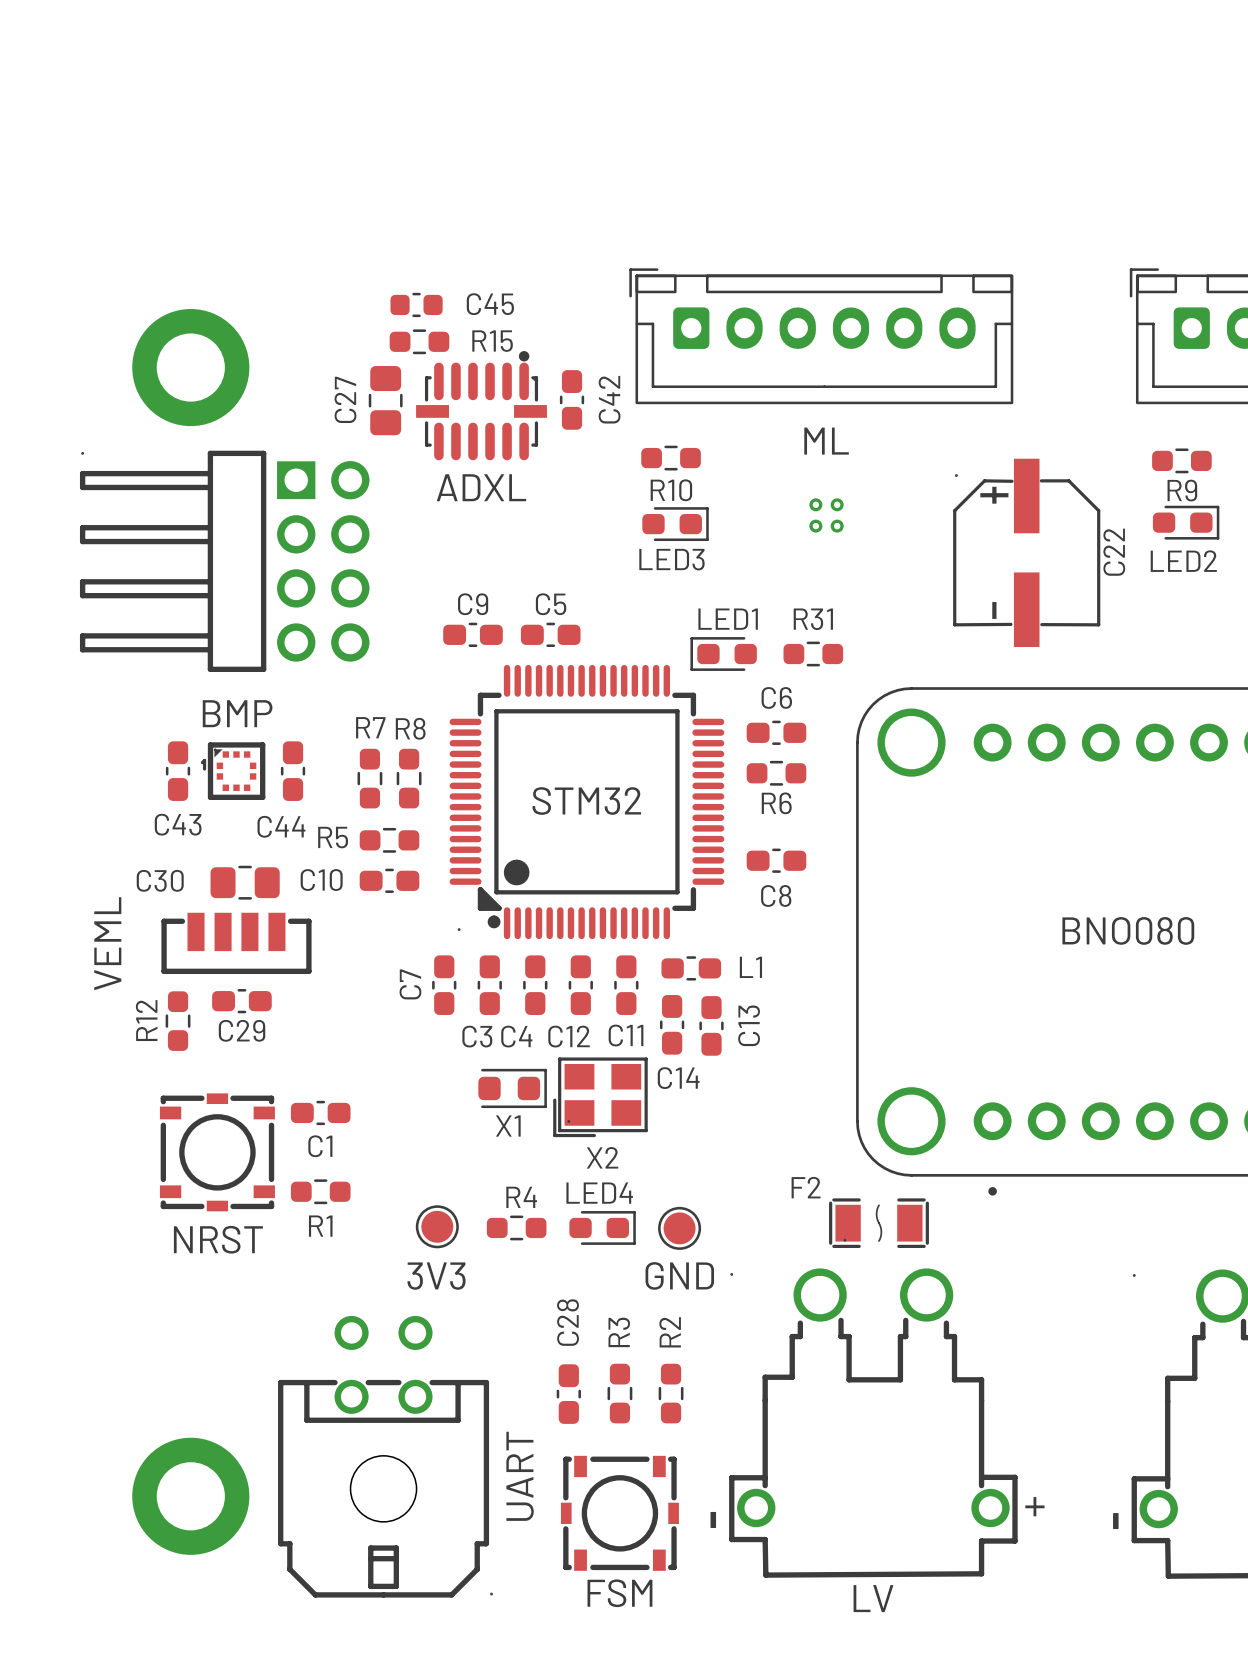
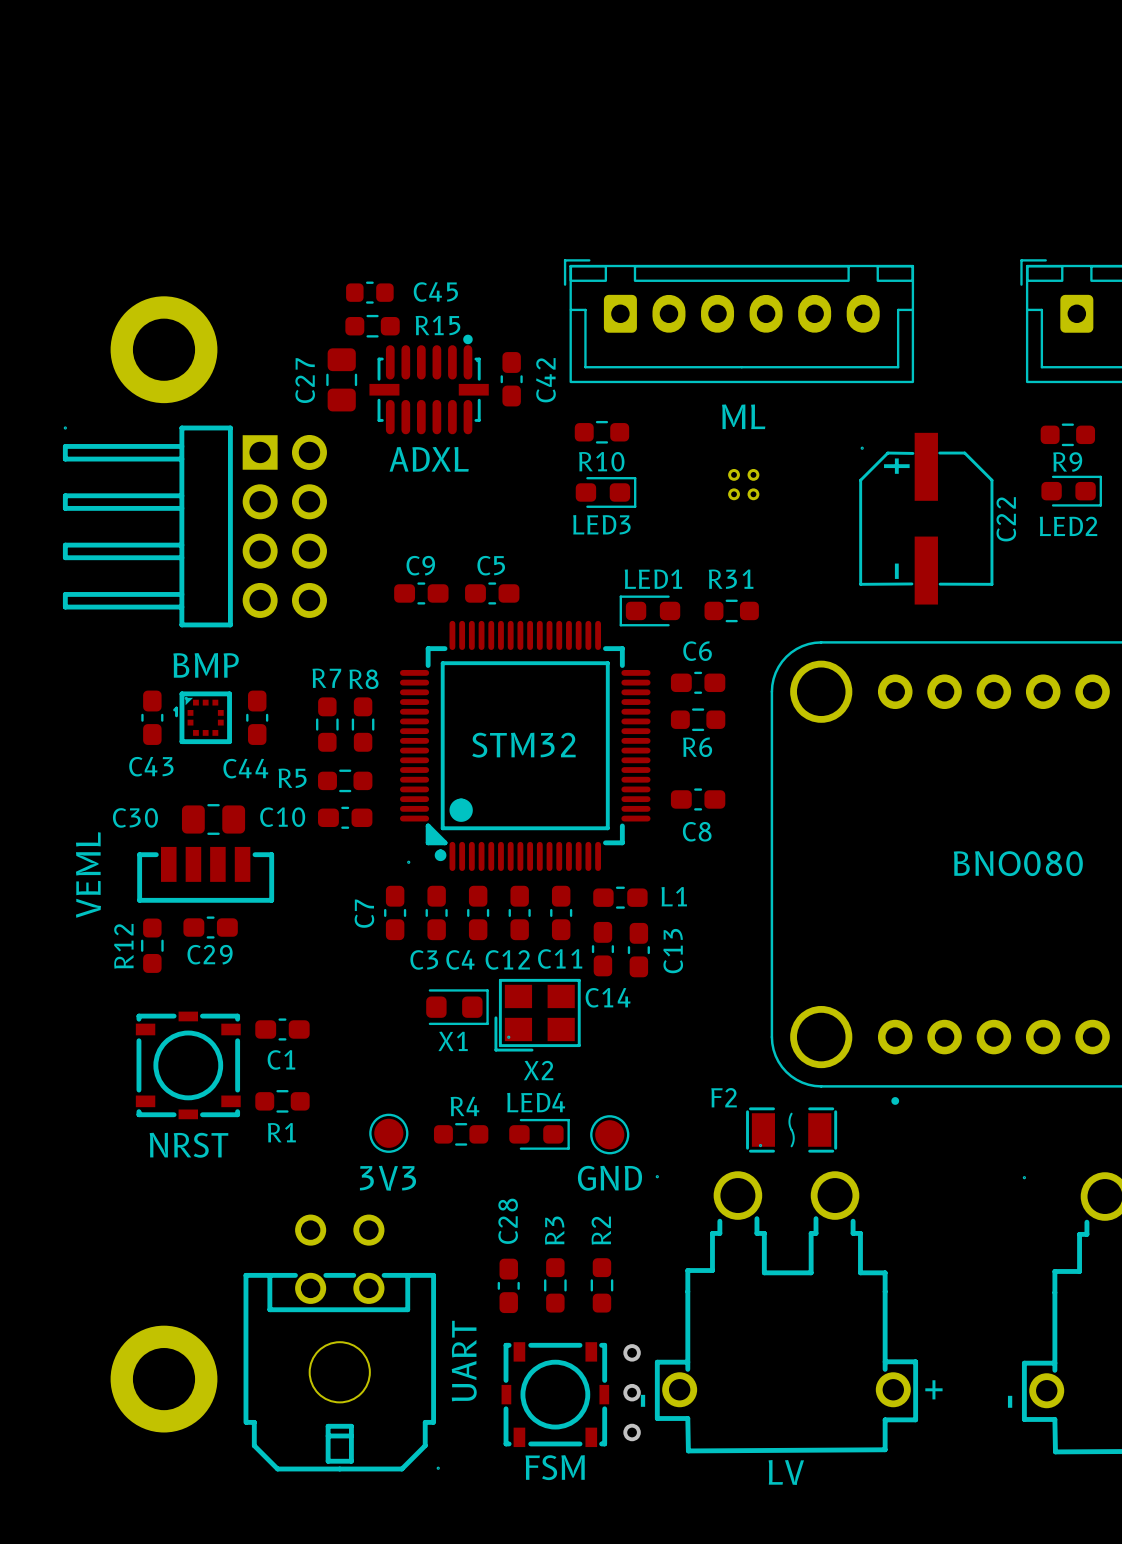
via: none -> (632, 1352)
via: none -> (632, 1392)
via: none -> (632, 1432)

